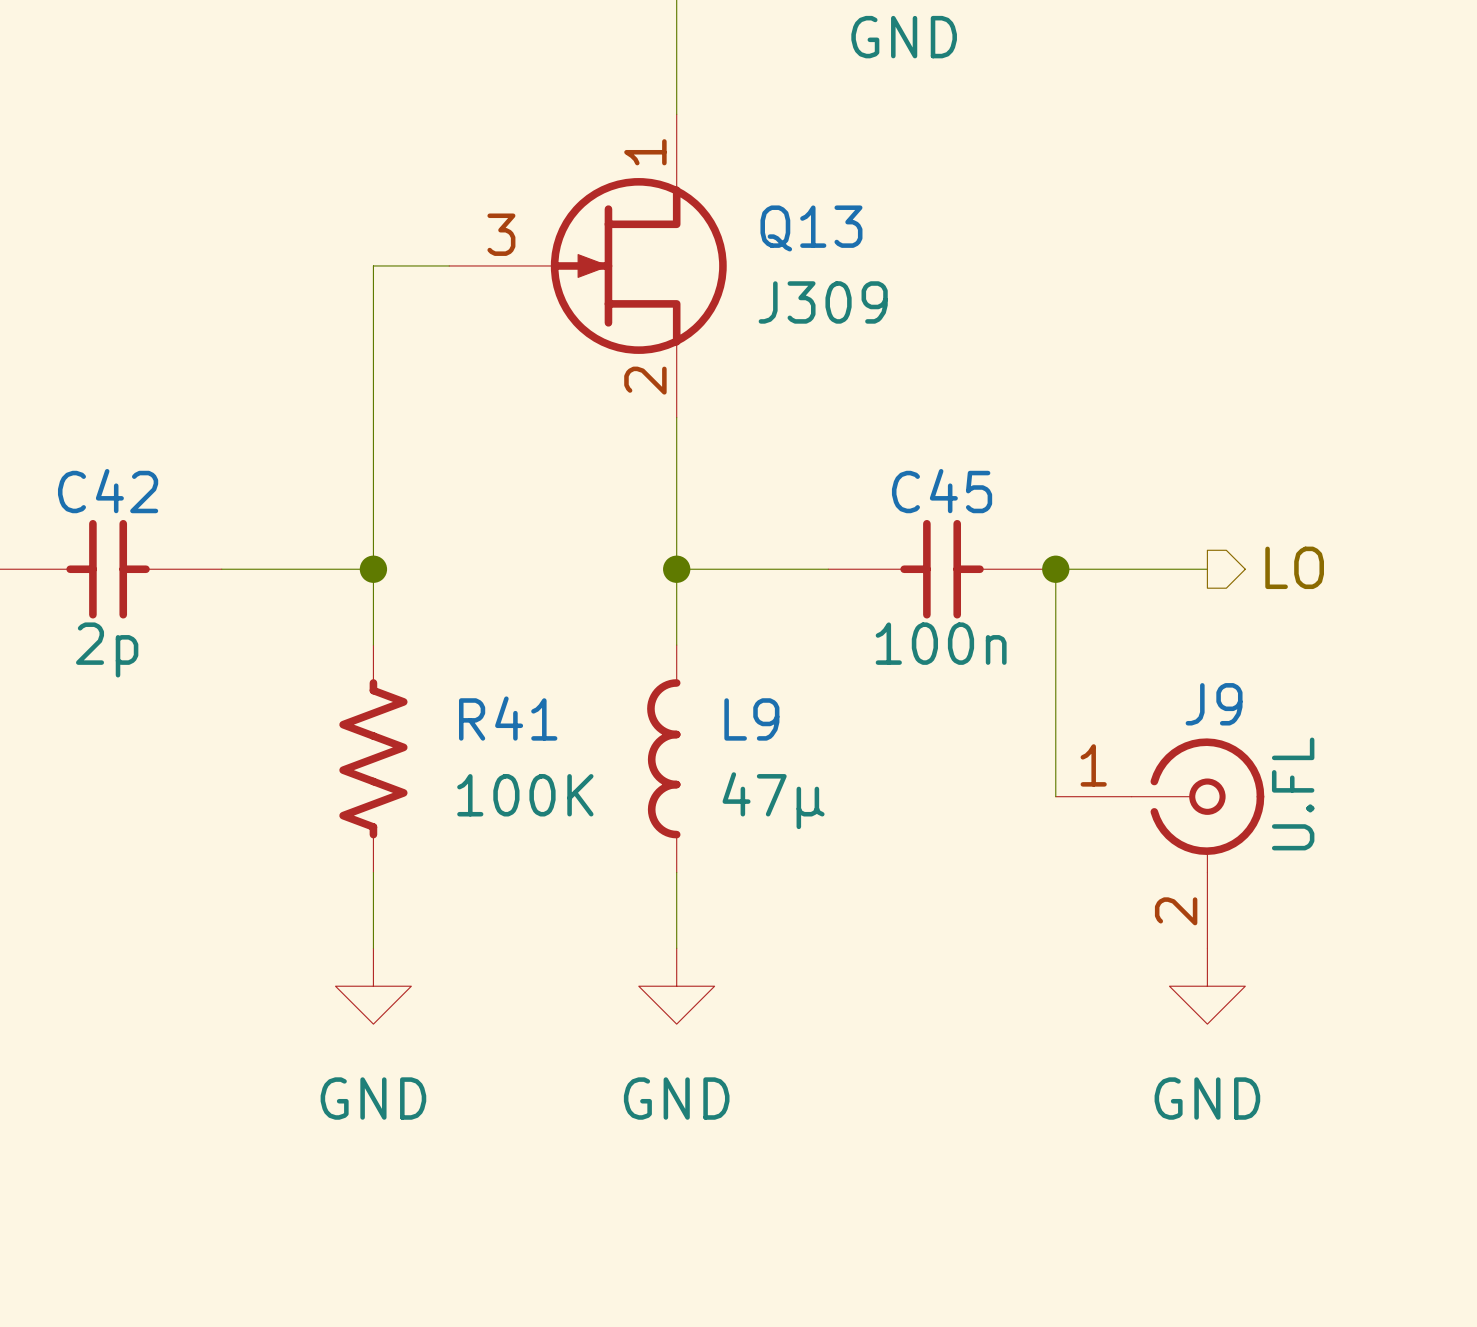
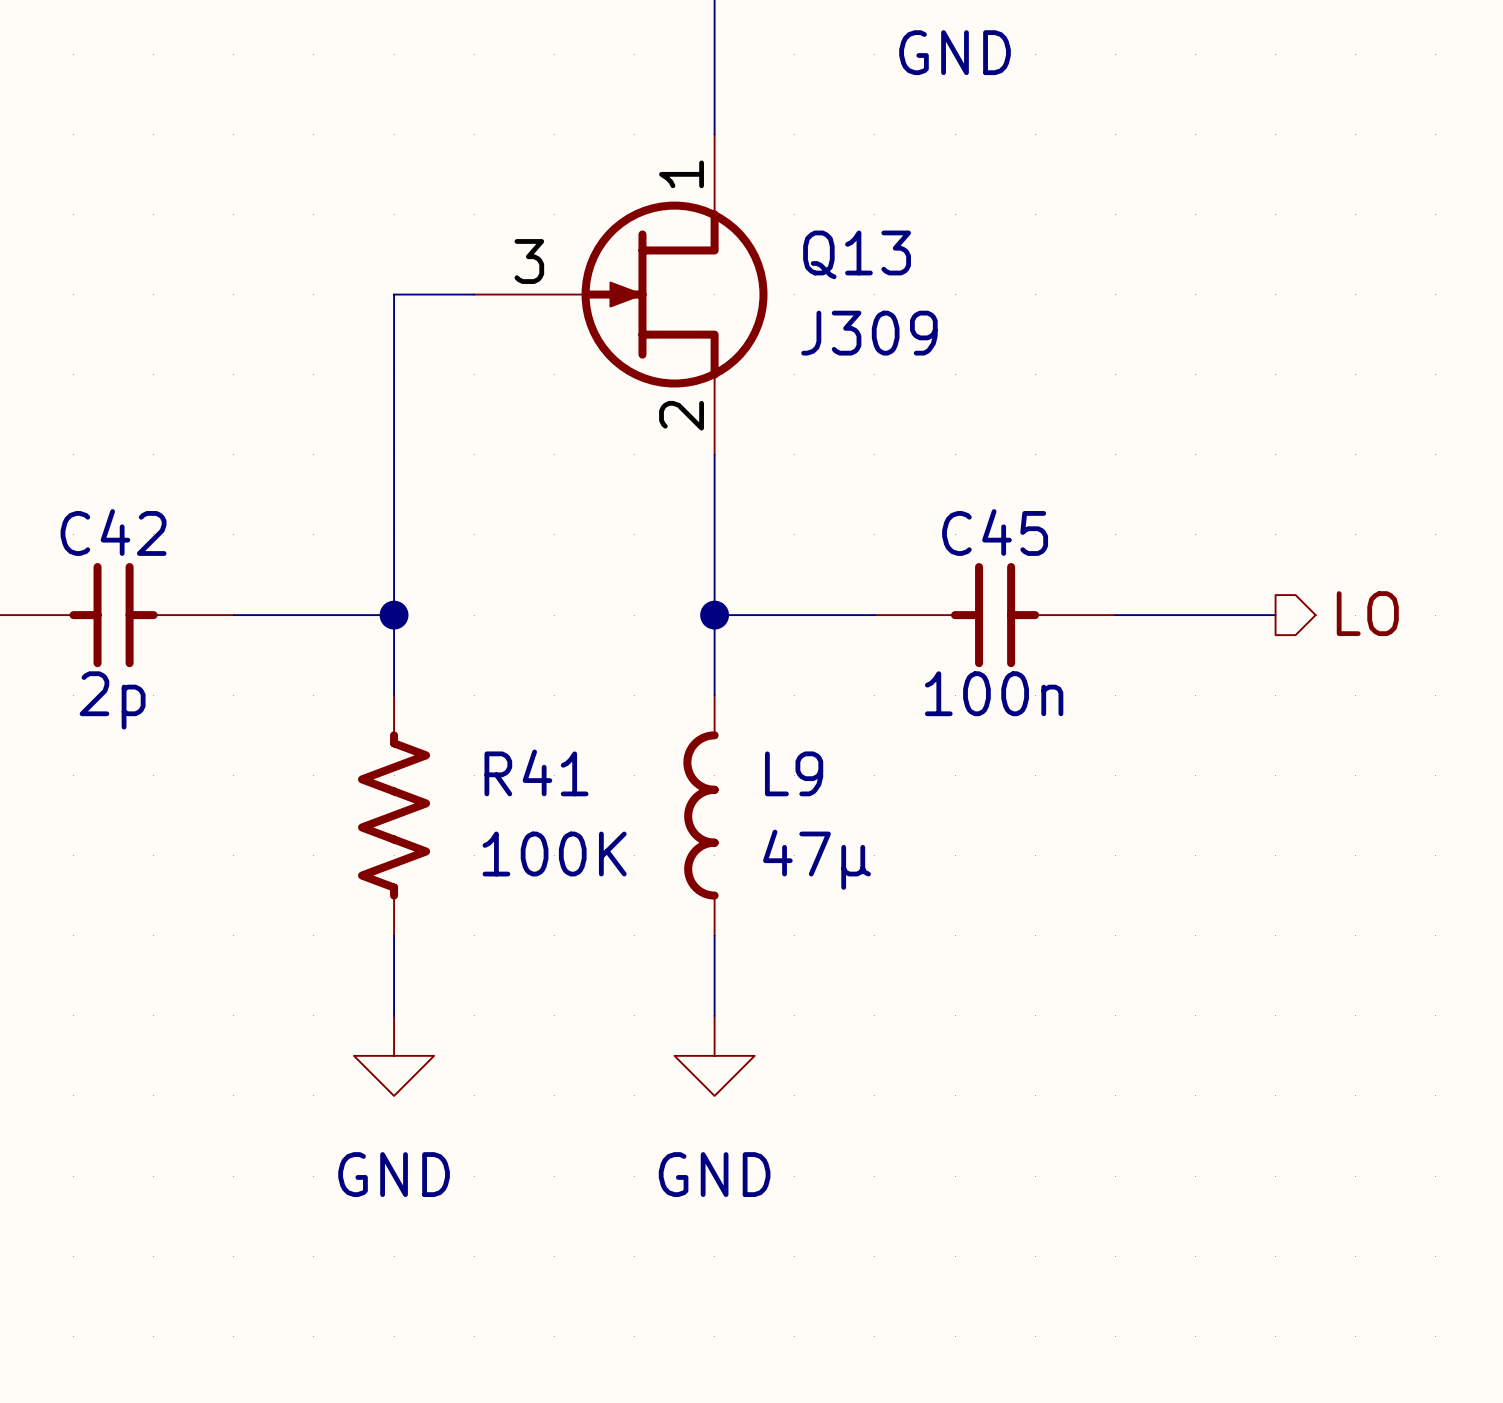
wire: (1055, 569) (1055, 796) -> none
junction: (1055, 569) -> none
J9: U.FL (1160, 843) -> none
power symbol: GND (1207, 986) -> none

